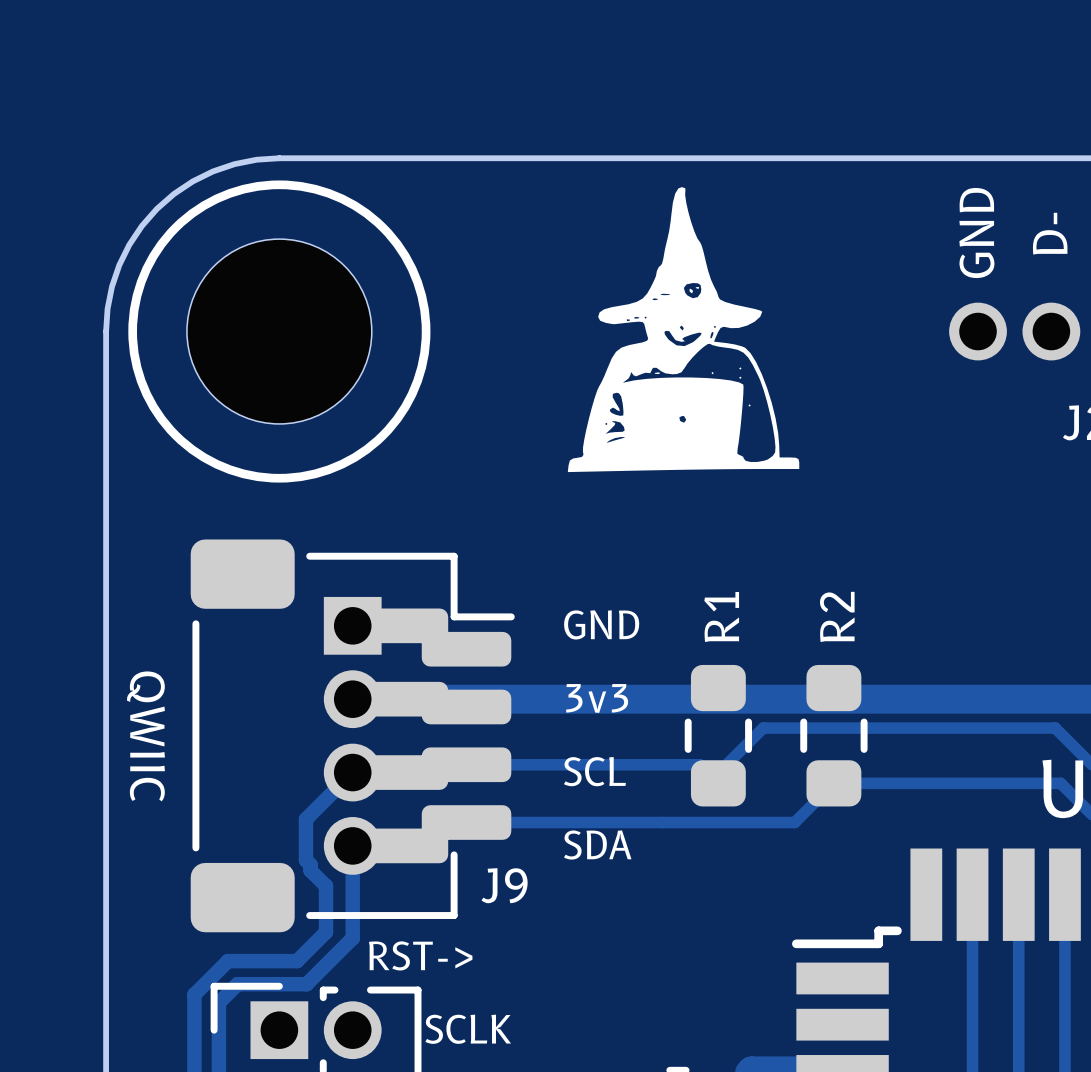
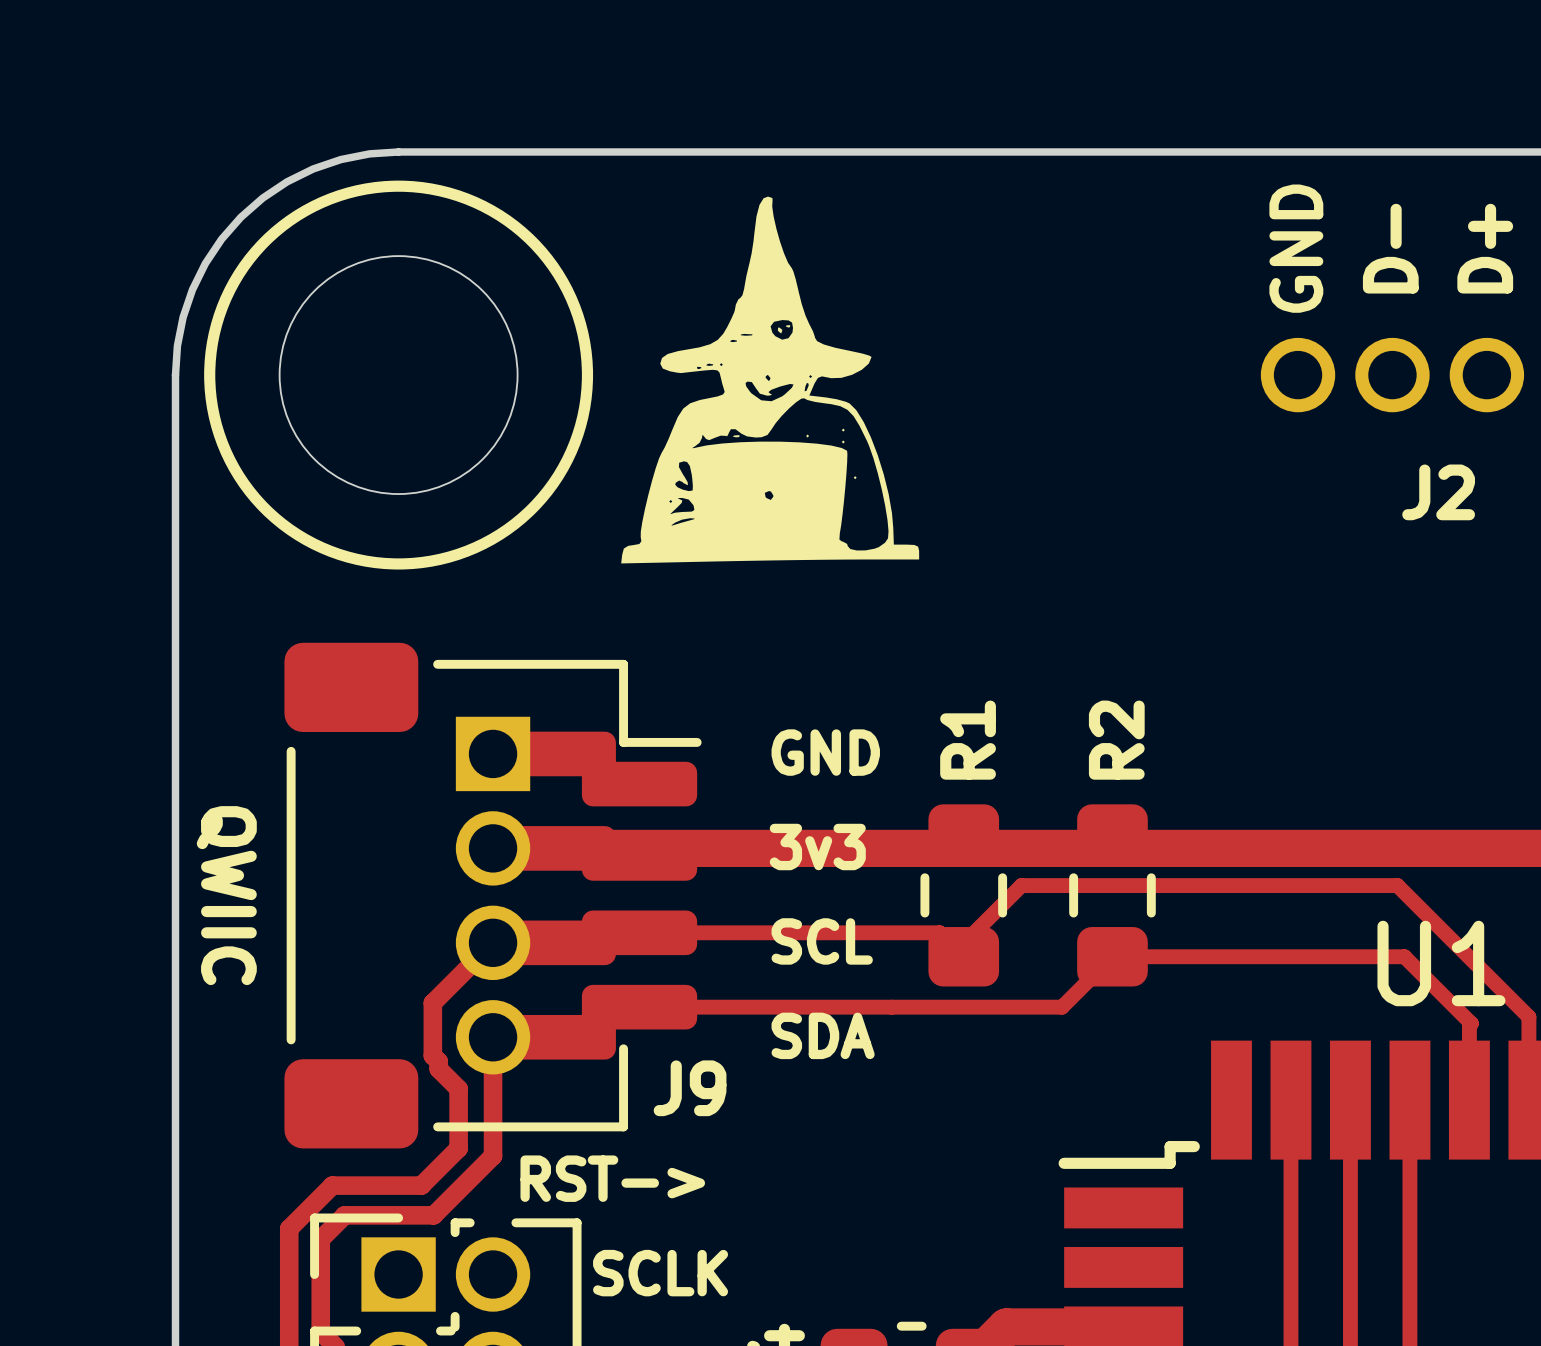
drawing position: (683, 329) -> (770, 380)

